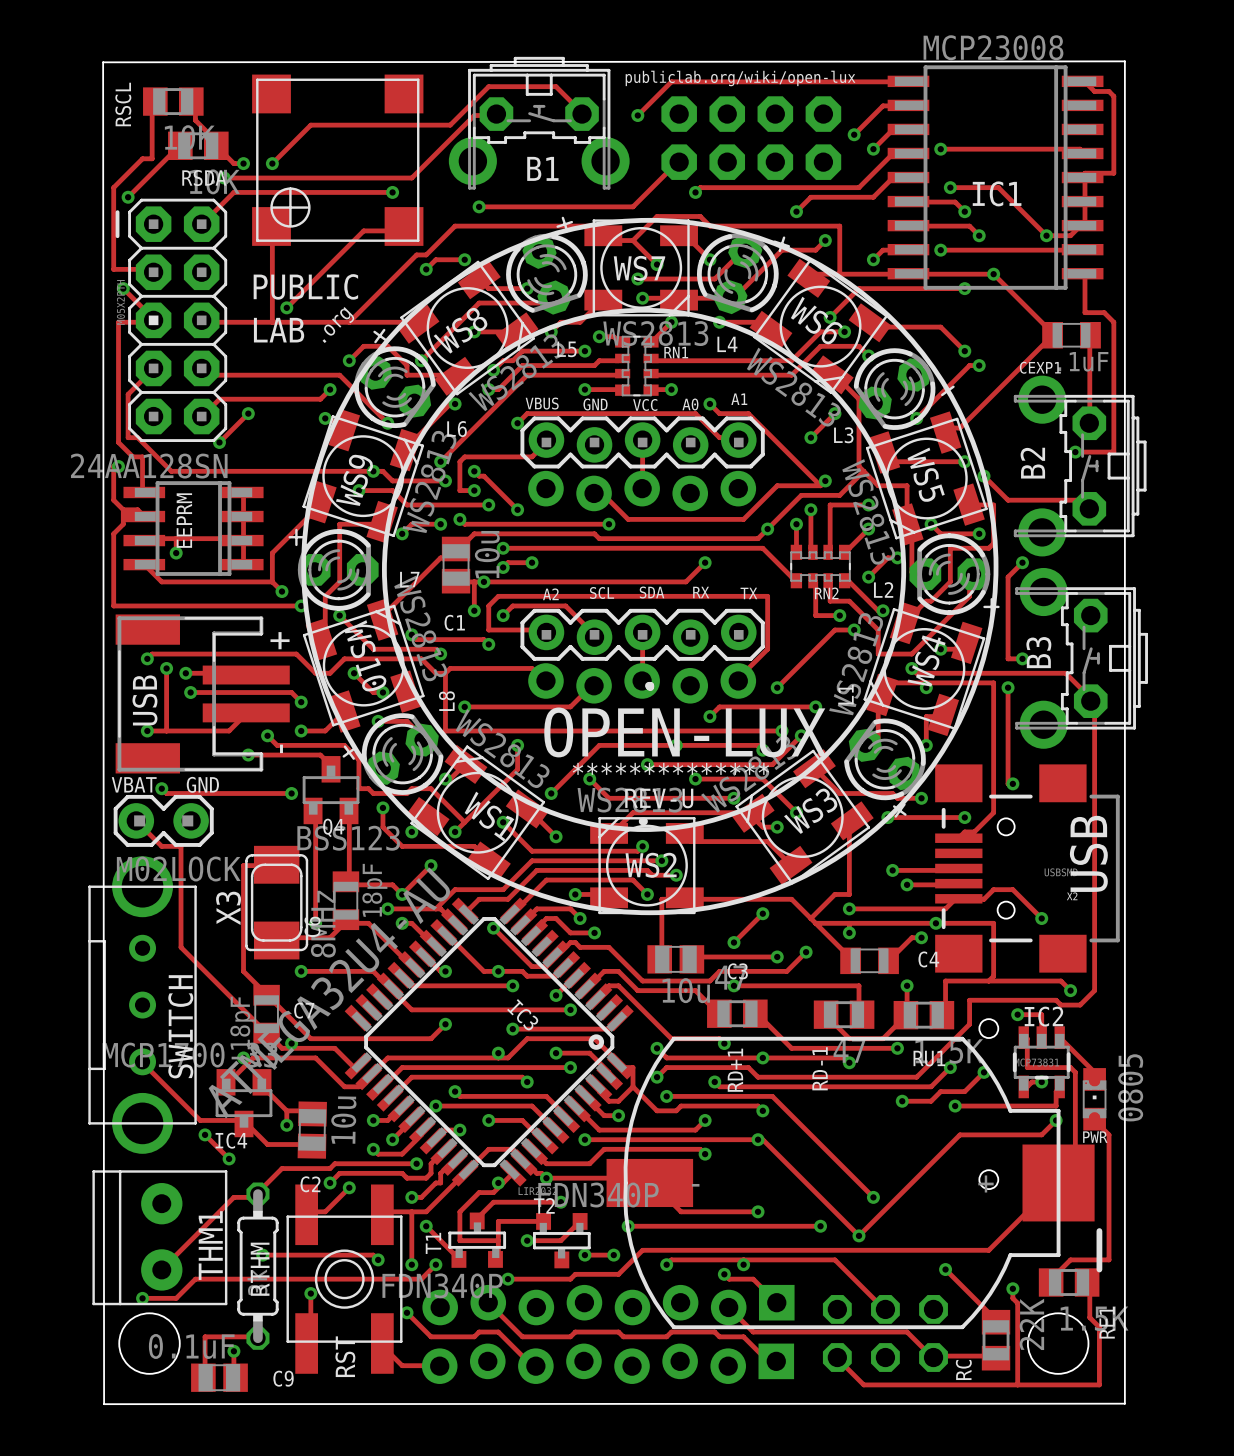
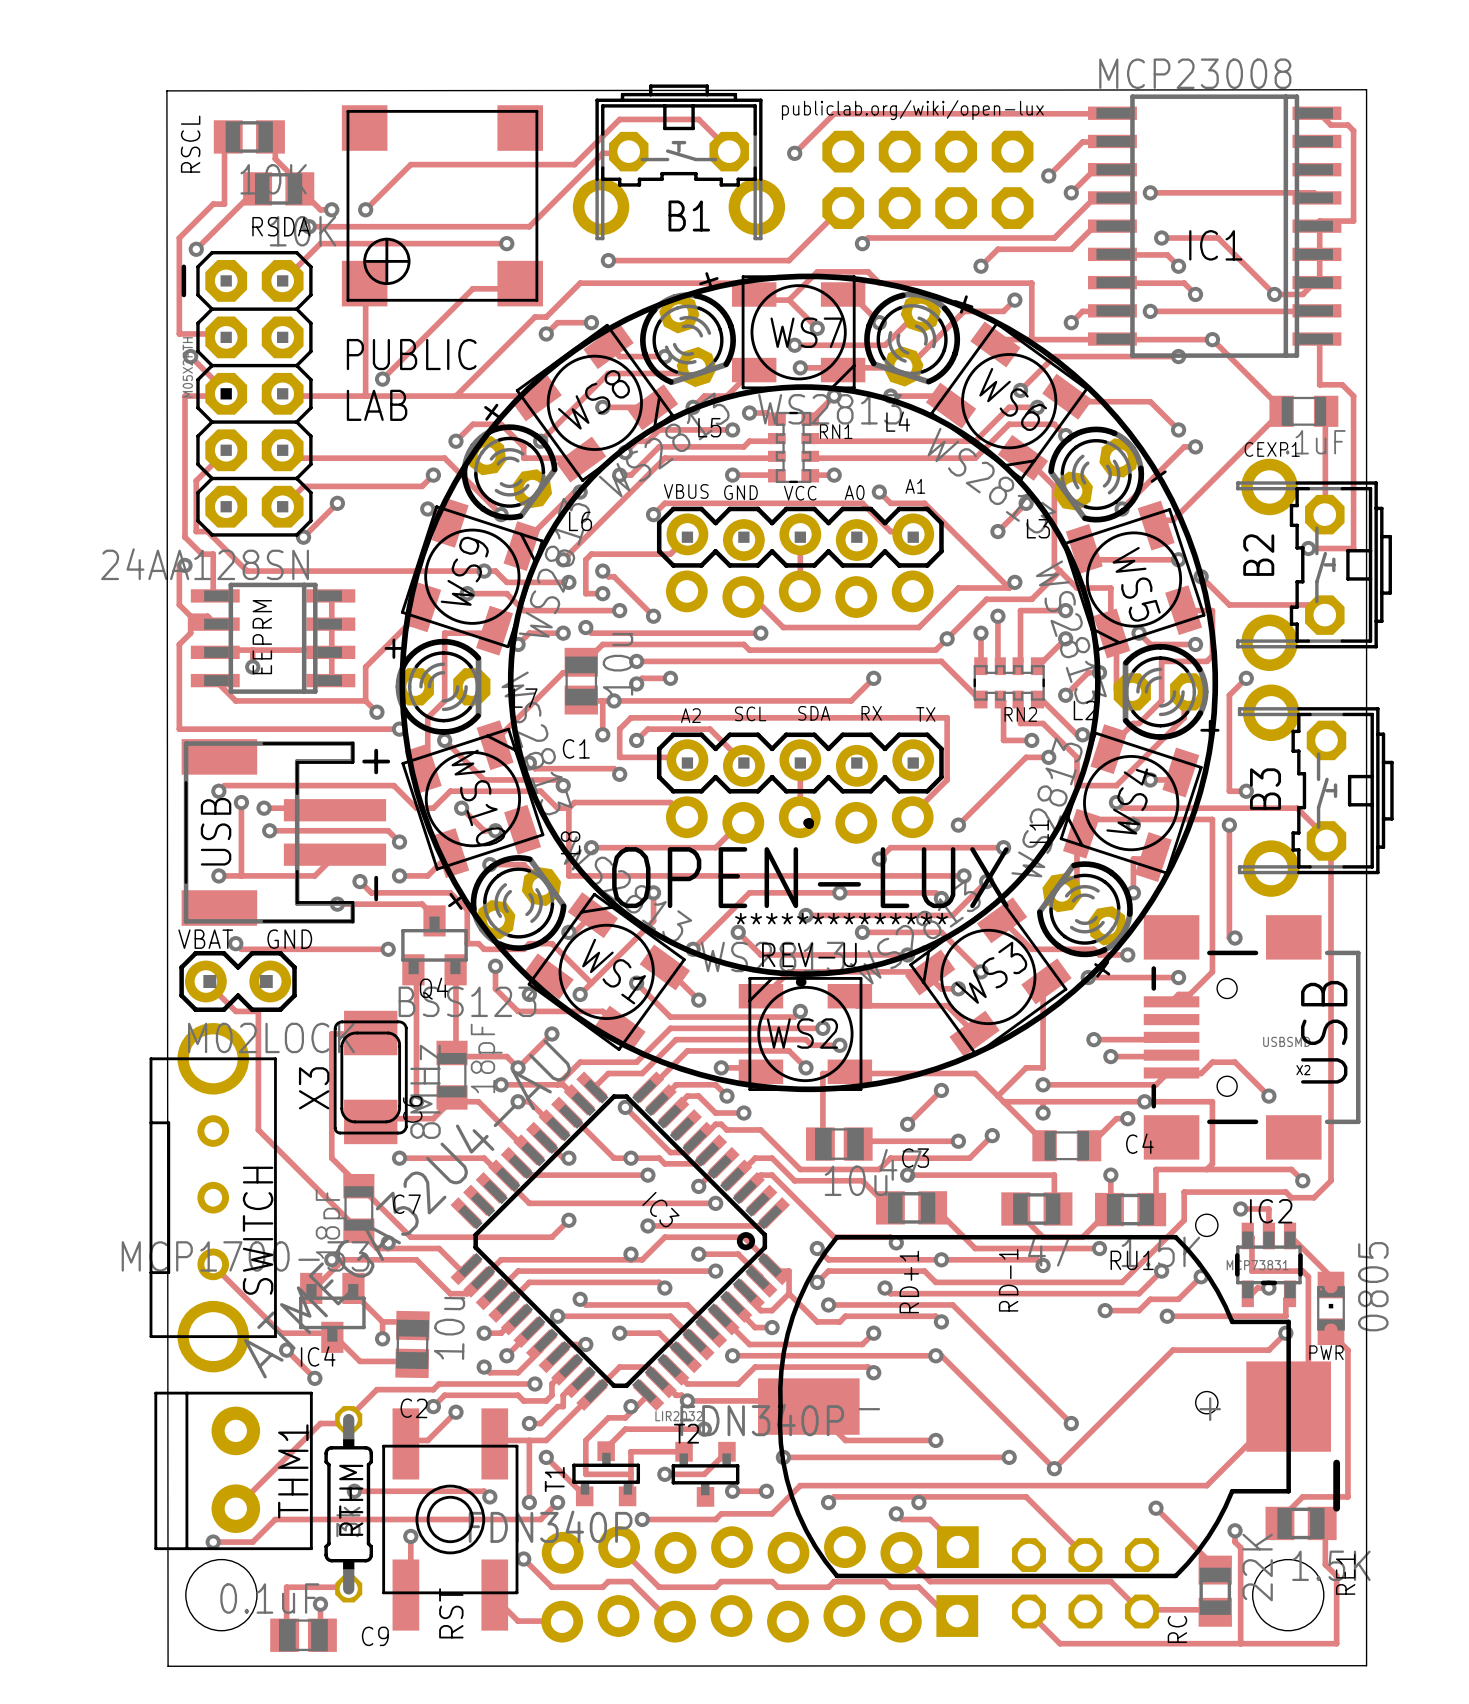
drawing shape: [382, 307, 907, 832] -> [507, 384, 1101, 977]
text: .org (338, 325) -> none

